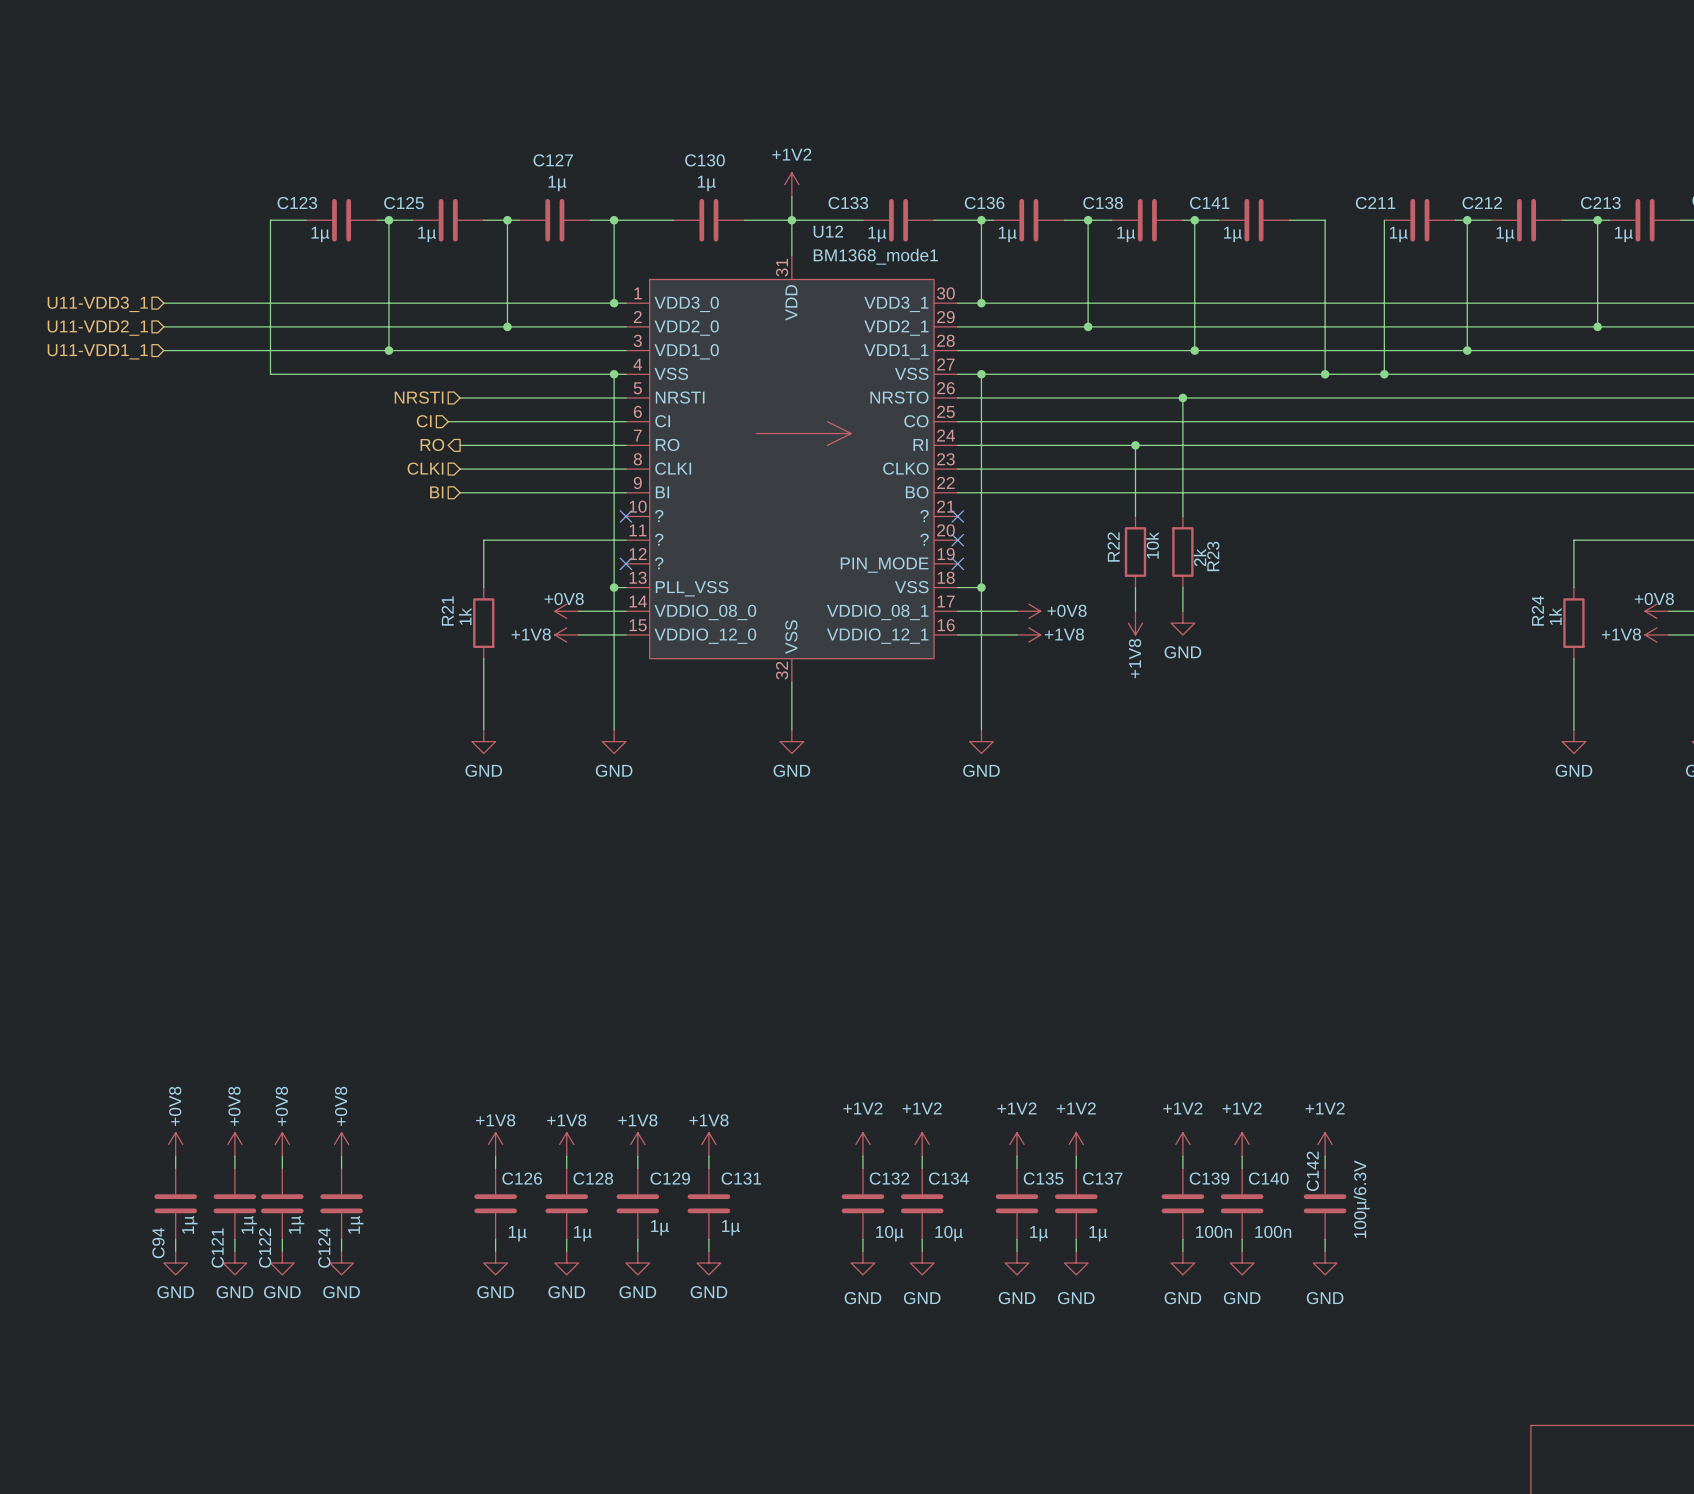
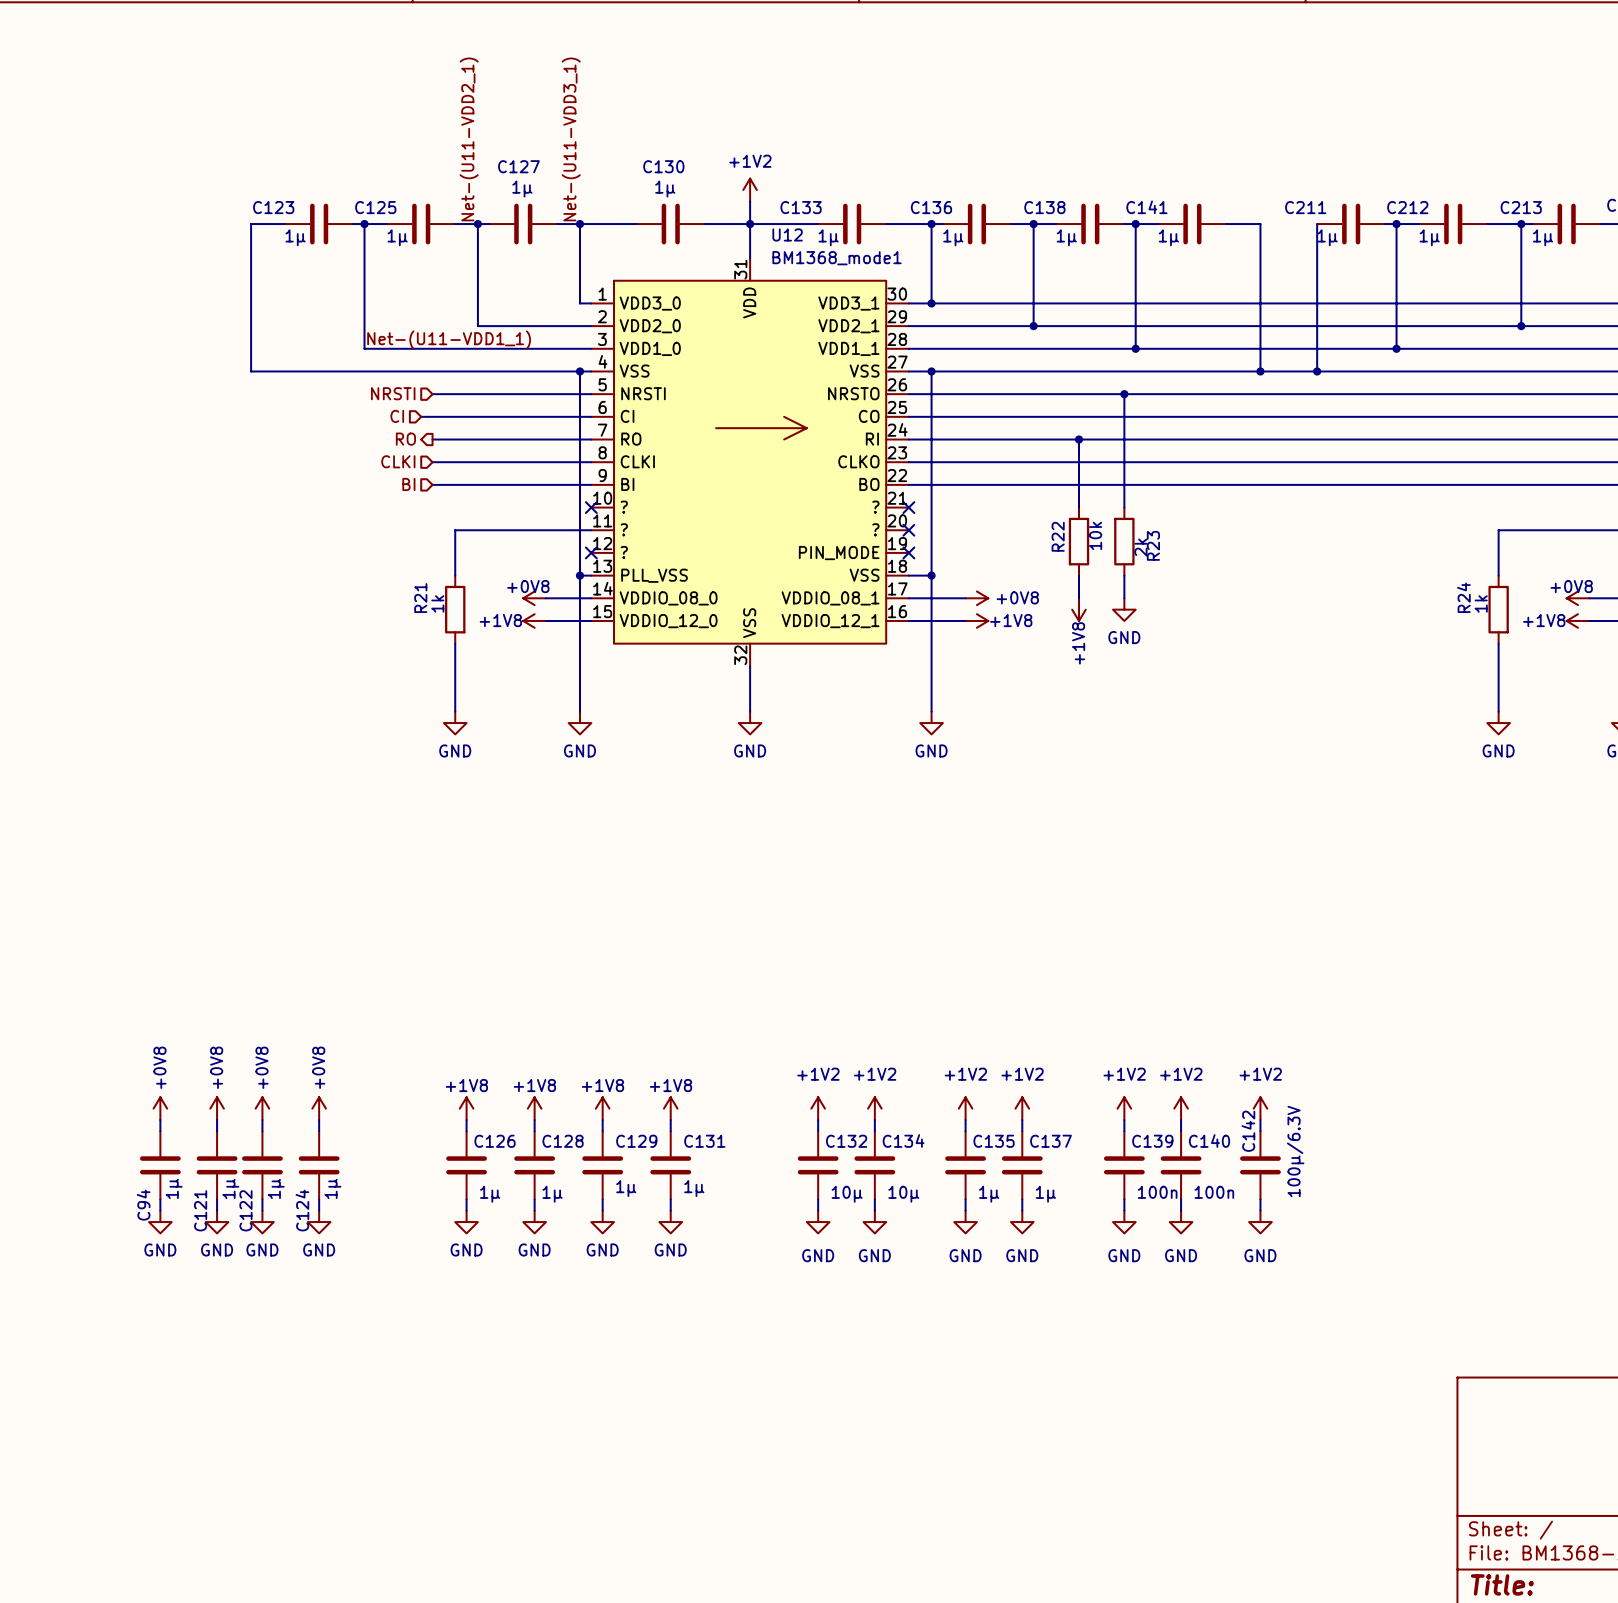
label: none -> Net-(U11-VDD2_1) (469, 139)
label: none -> Net-(U11-VDD3_1) (571, 139)
wire: (163, 303) (614, 303) -> none
junction: (614, 303) -> none
hierarchical label: U11-VDD3_1 (97, 304) -> none
wire: (163, 326) (507, 326) -> none
junction: (507, 326) -> none
hierarchical label: U11-VDD2_1 (97, 328) -> none
label: none -> Net-(U11-VDD1_1) (449, 340)
wire: (163, 350) (388, 350) -> none
junction: (388, 350) -> none
hierarchical label: U11-VDD1_1 (97, 351) -> none

